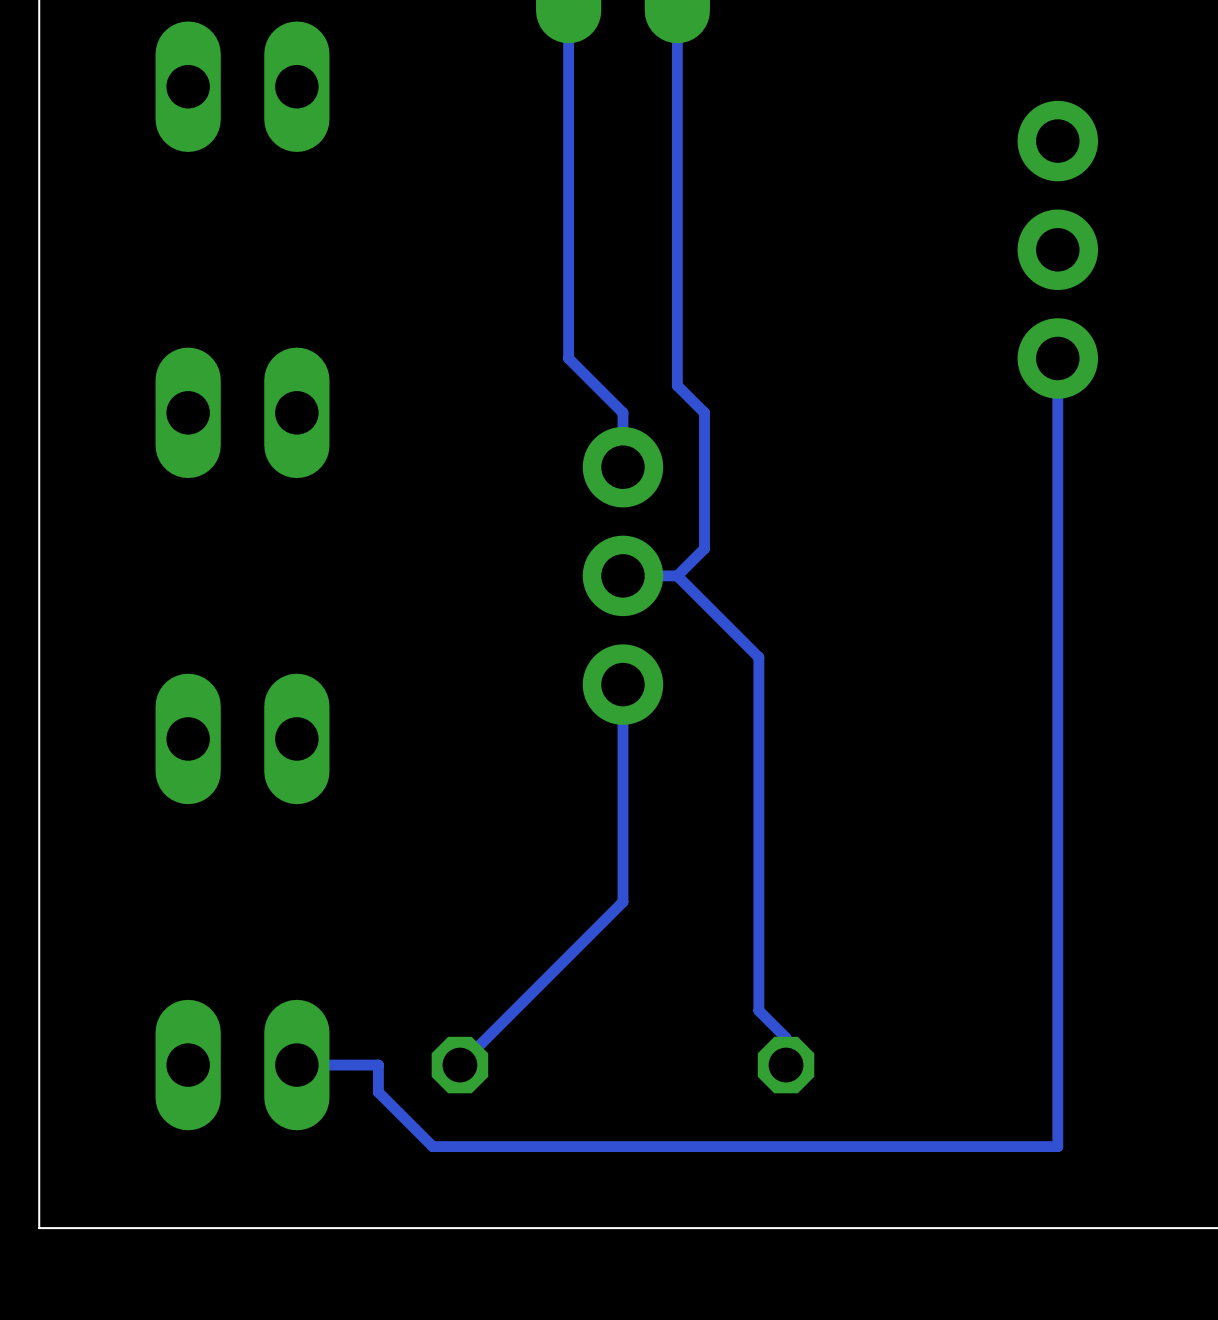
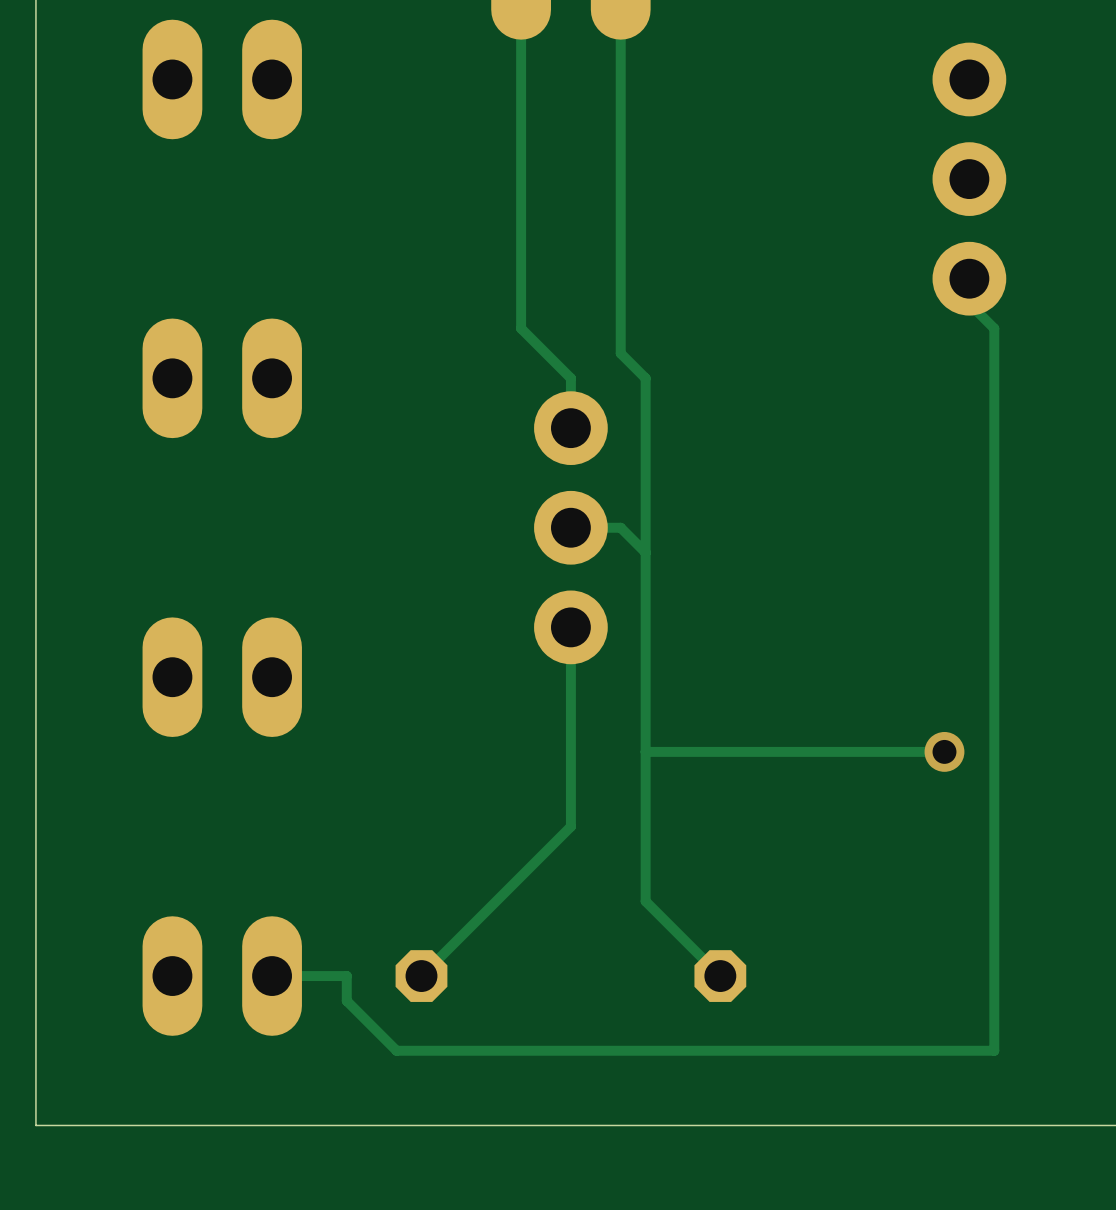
part position: (1057, 249) -> (969, 179)
track: (1057, 358) (1057, 1146) -> (969, 278) (969, 303) (994, 328) (994, 1050) (969, 1050)
track: (704, 548) (677, 575) -> none
track: (704, 603) (758, 657) (758, 1010) (786, 1037) (786, 1065) -> (645, 502) (645, 901) (720, 976)
track: none -> (944, 751) (645, 751)
via: none -> (944, 751)

